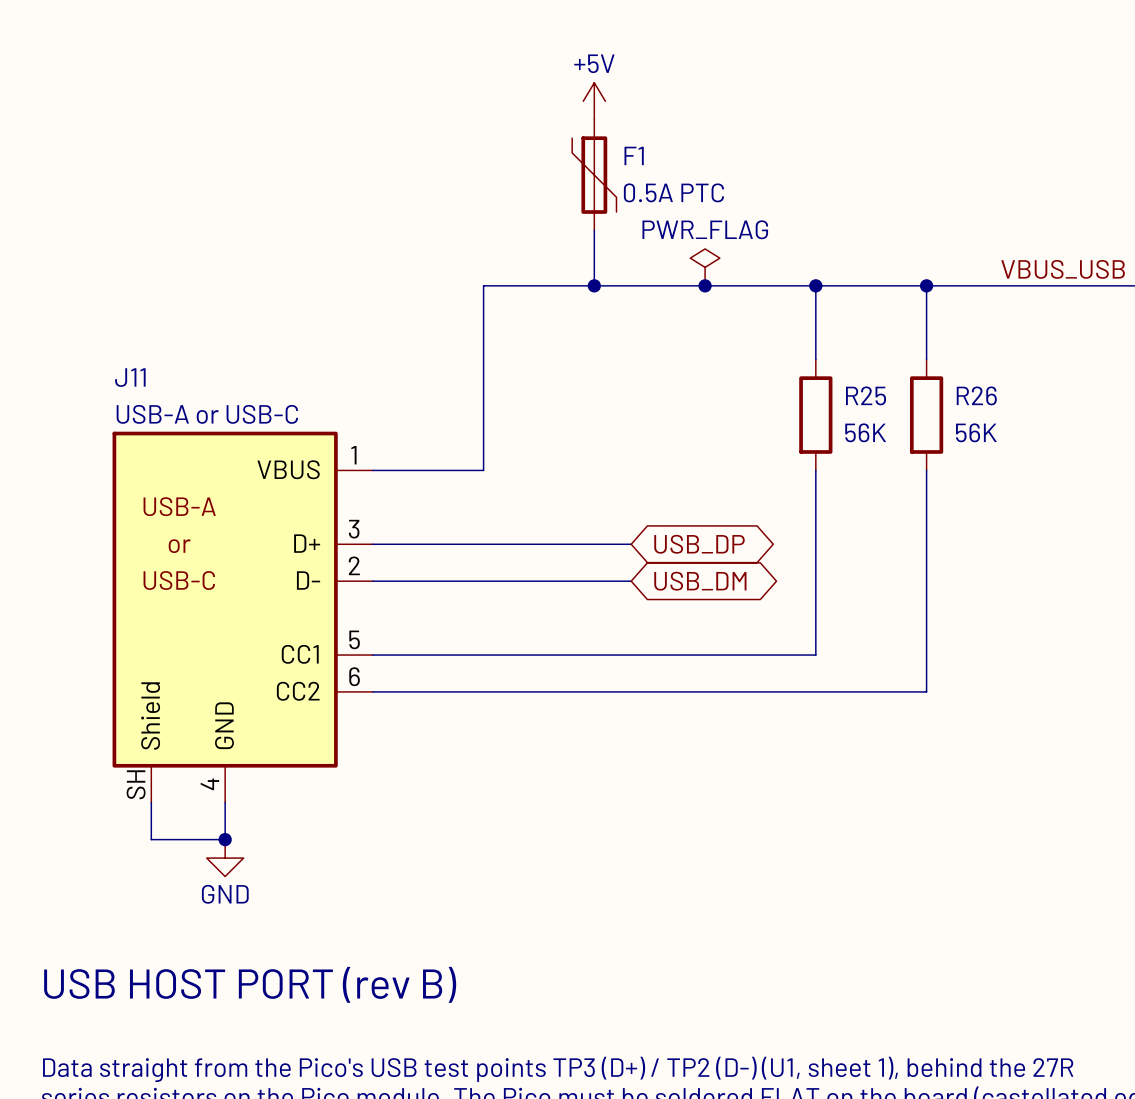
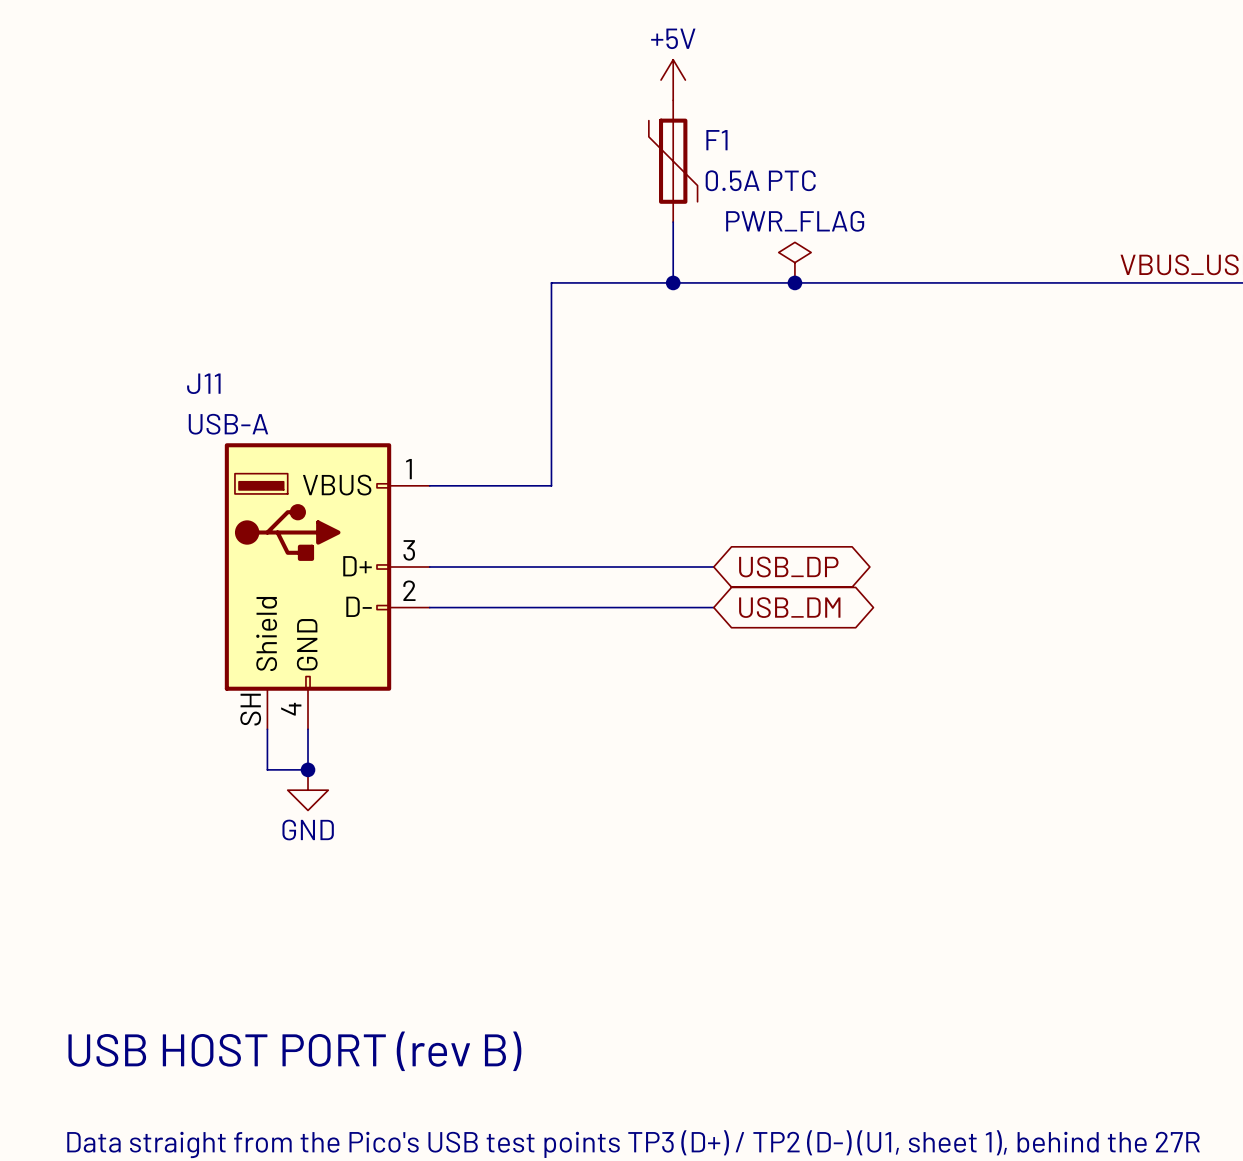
wire: (815, 285) (815, 359) -> none
junction: (815, 285) -> none
wire: (926, 285) (926, 359) -> none
junction: (926, 285) -> none
J11 name position: J11 (130, 377) -> J11 (203, 383)
J11 value: USB-A or USB-C (207, 414) -> USB-A (228, 424)
R25: 56K (815, 415) -> none
R26: 56K (926, 415) -> none
J11 symbol: [112, 431, 373, 803] -> [224, 443, 430, 730]
wire: (815, 470) (815, 655) (372, 655) -> none
wire: (926, 470) (926, 691) (372, 691) -> none
junction: none -> (308, 769)
wire: (151, 802) (151, 839) (225, 839) (225, 802) -> none
junction: (225, 839) -> none
power symbol position: GND (225, 858) -> GND (308, 790)

